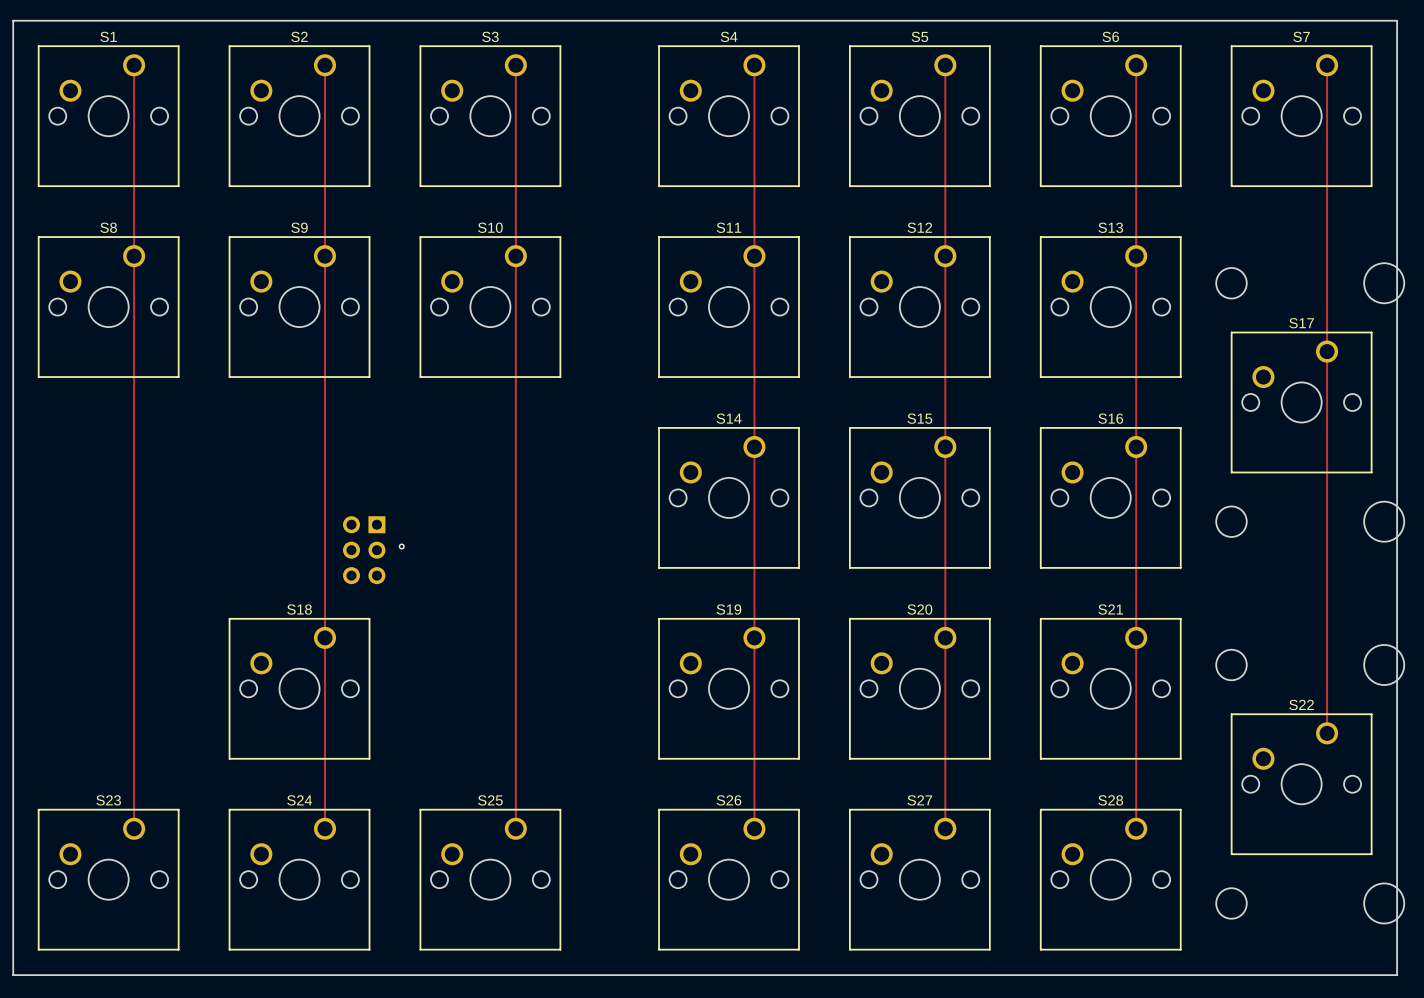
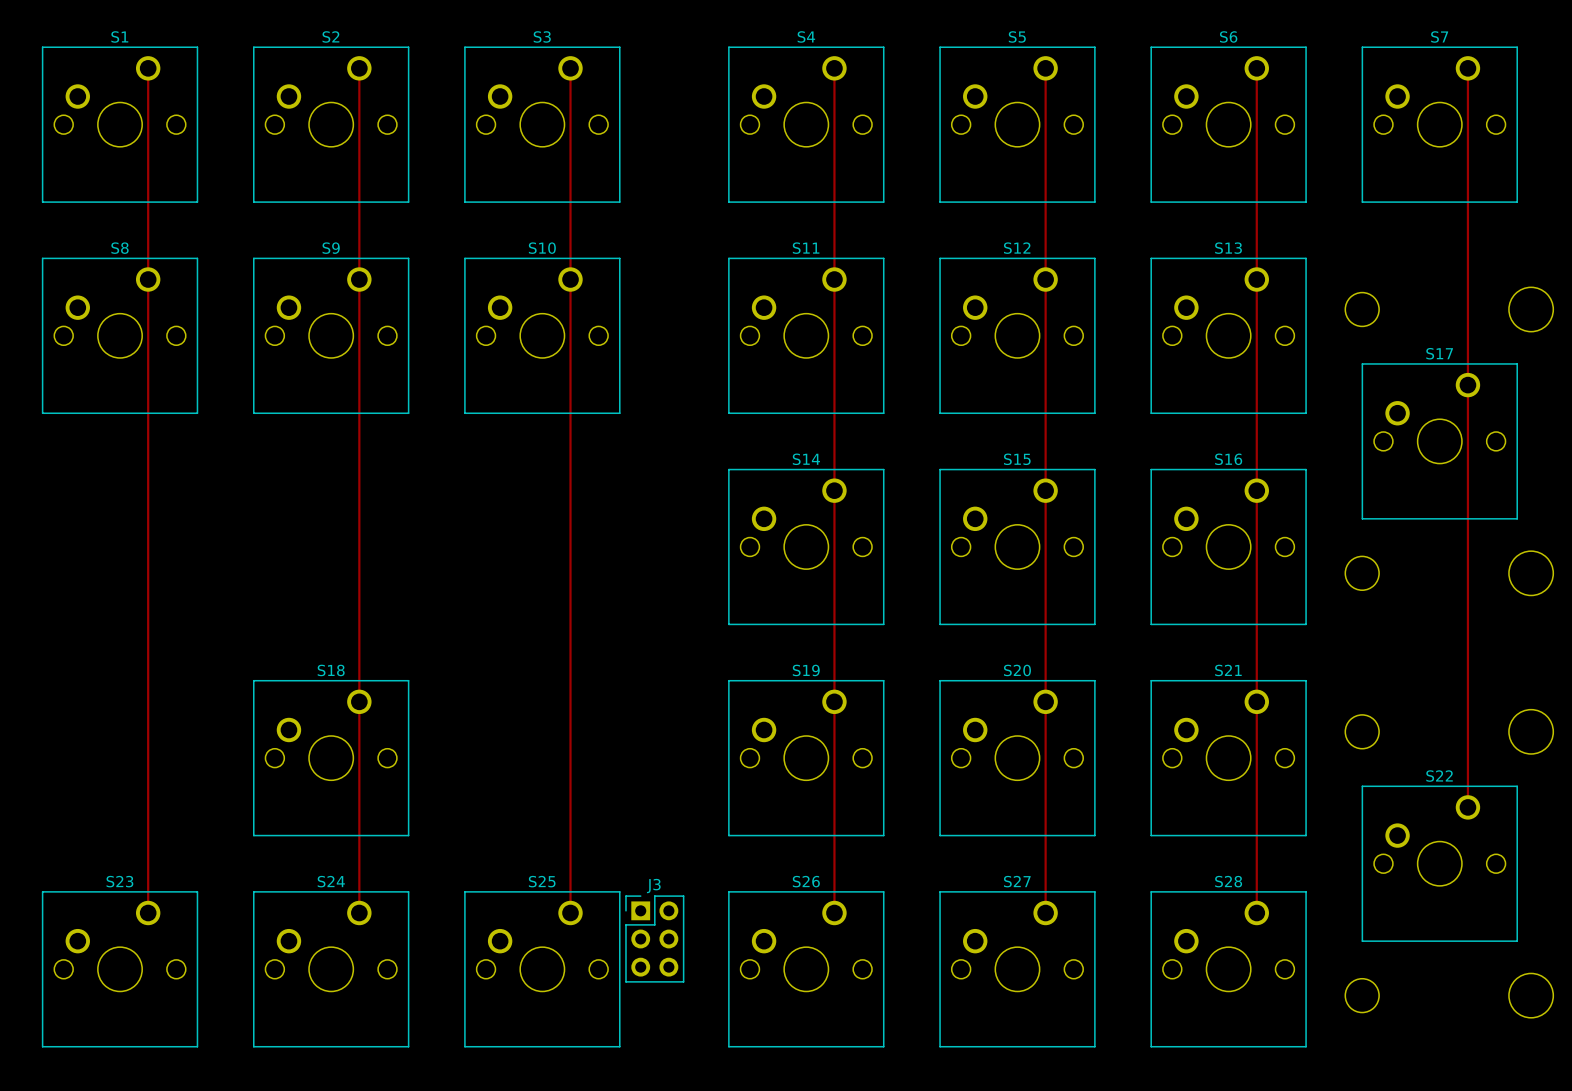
board edge: (13, 20) (13, 975) (1397, 975) (1397, 20) (13, 20) -> none
via: (401, 546) -> none
part: (364, 550) -> none
J3: none -> (654, 938)

